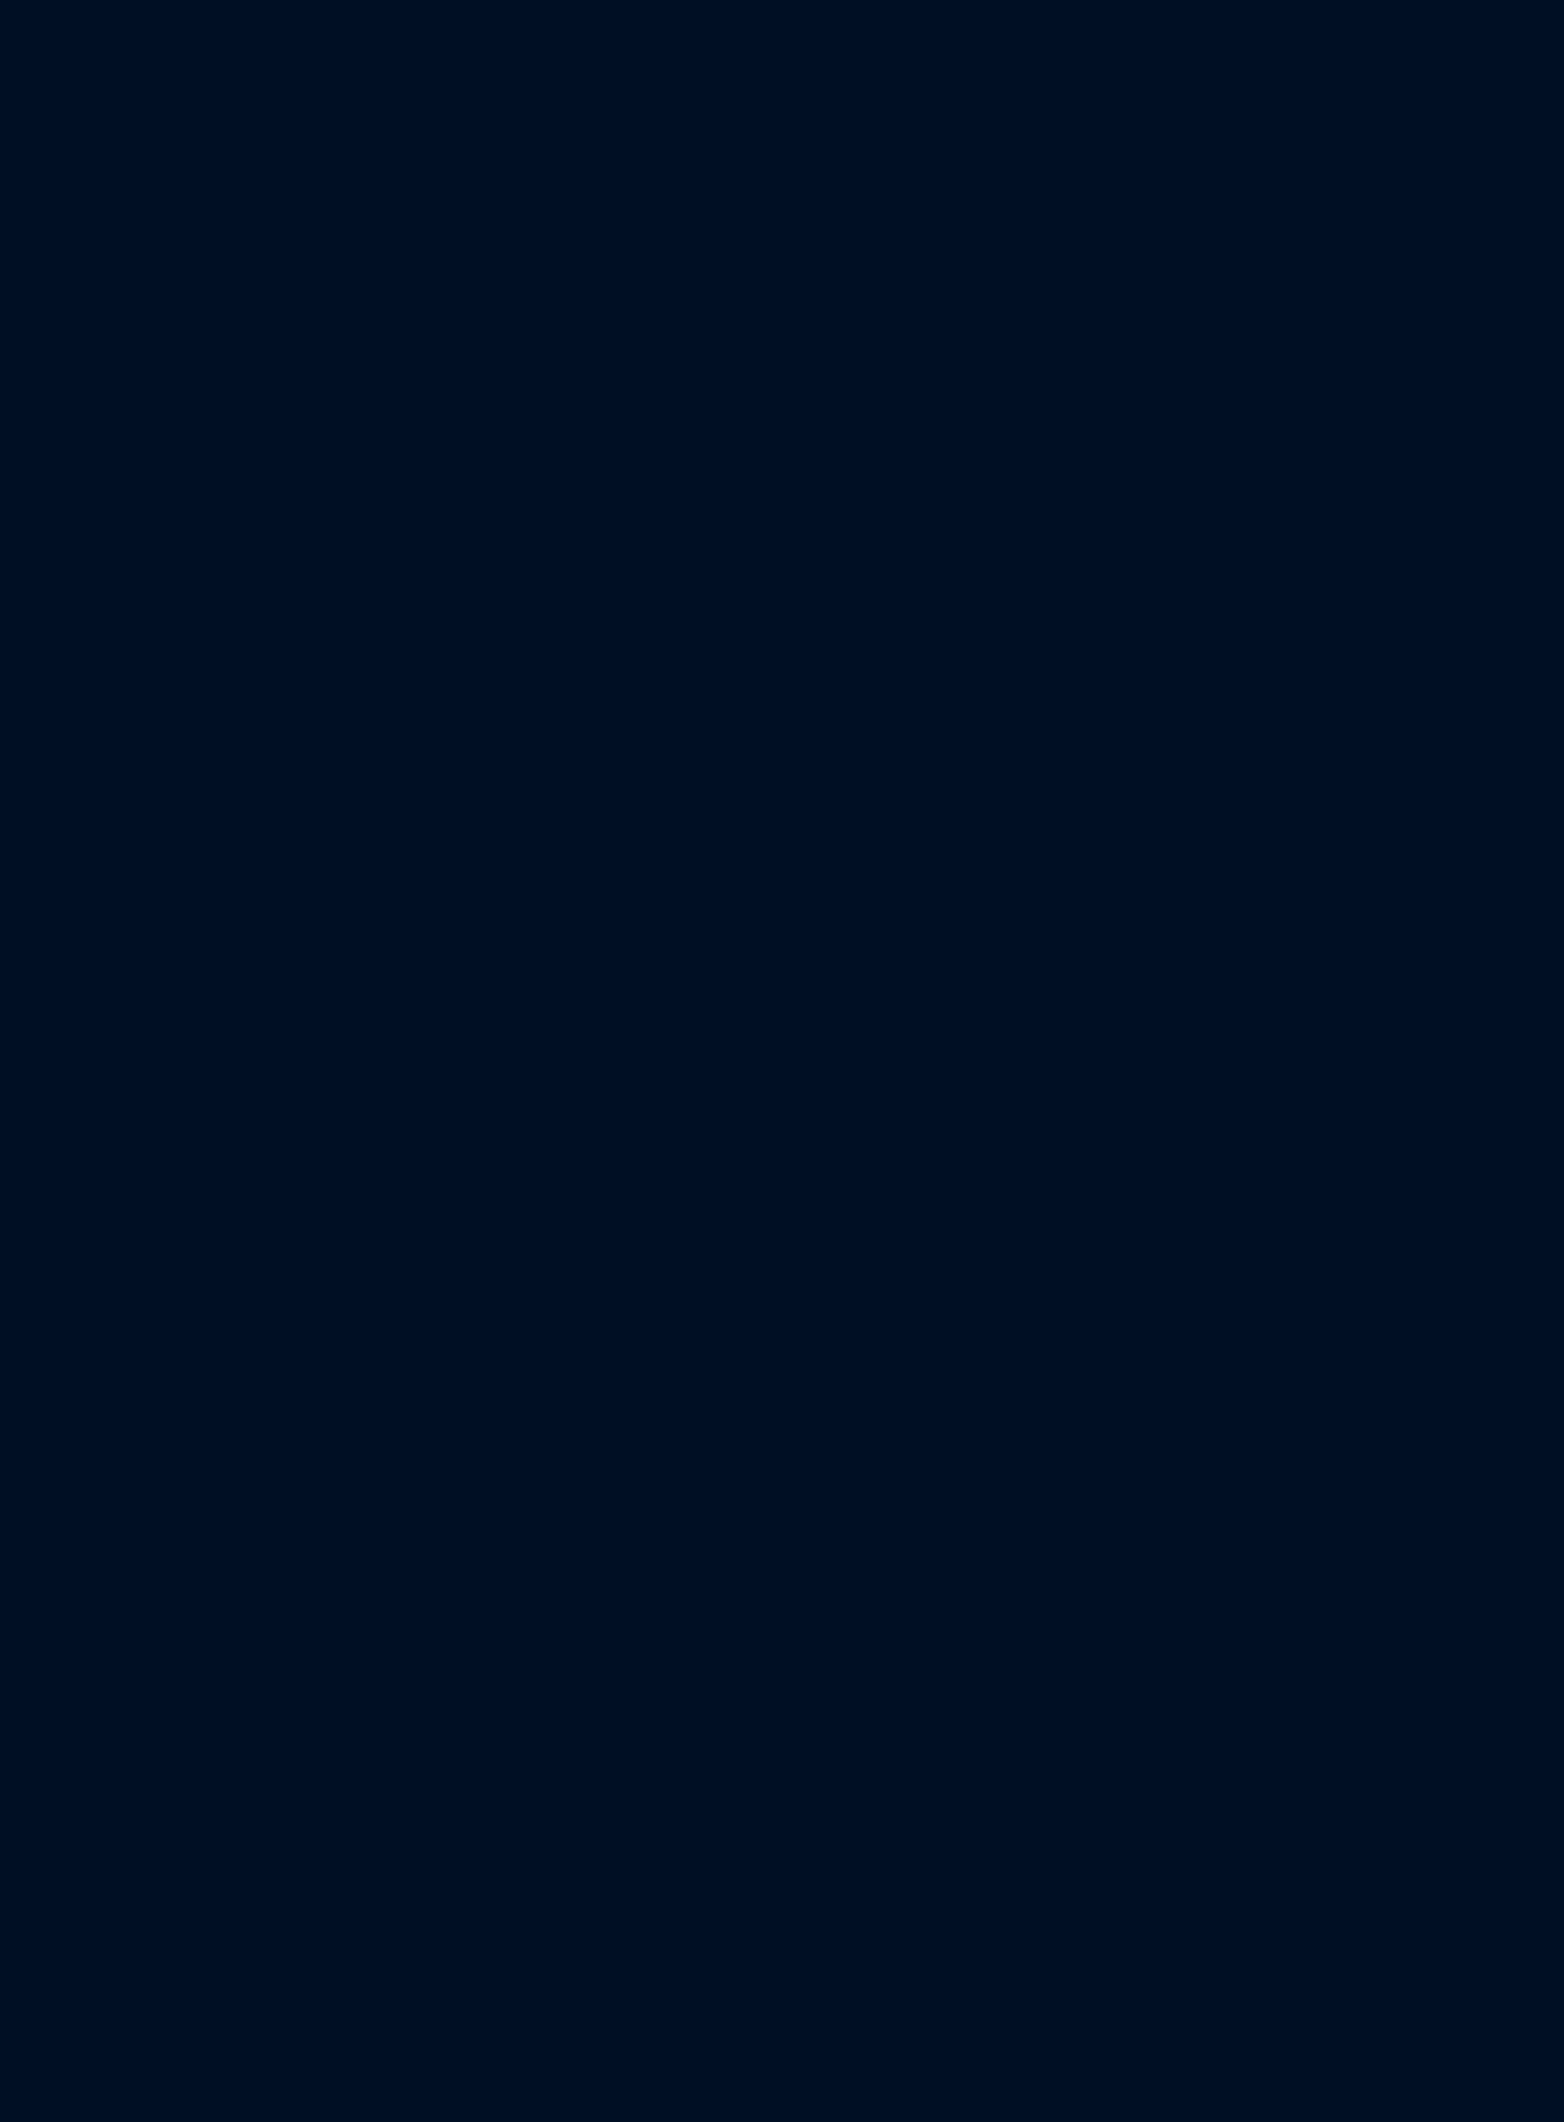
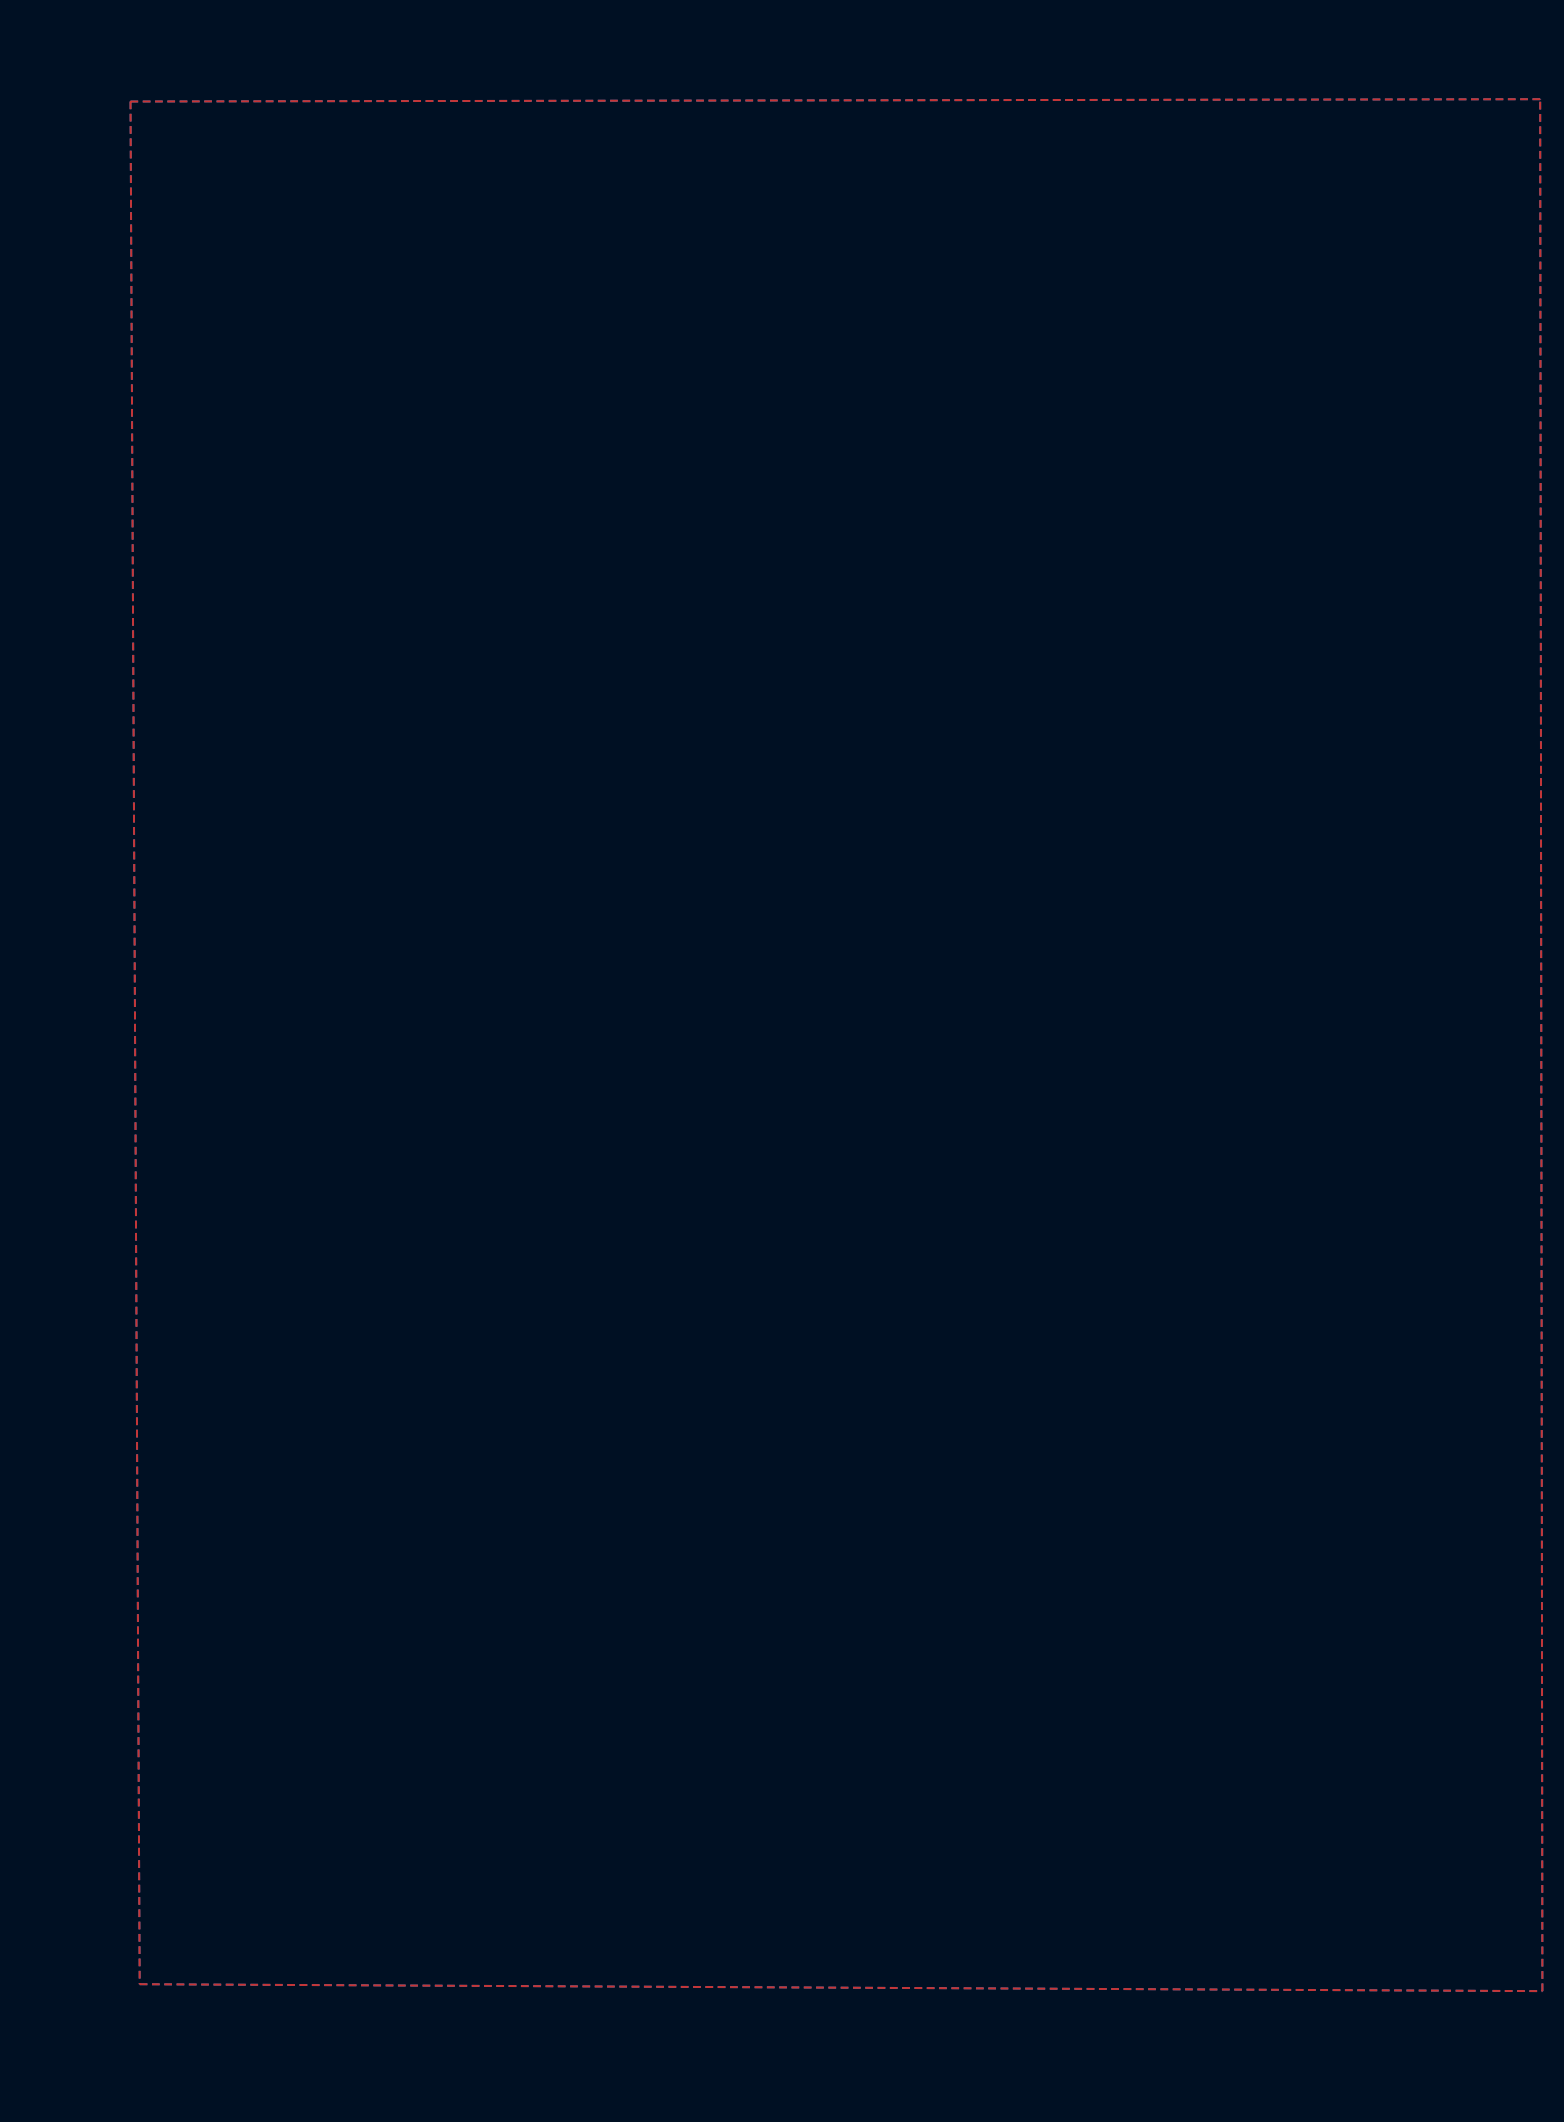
top zone outline: none -> (1540, 99) (130, 101) (139, 1984) (1542, 1991) (1540, 99)

